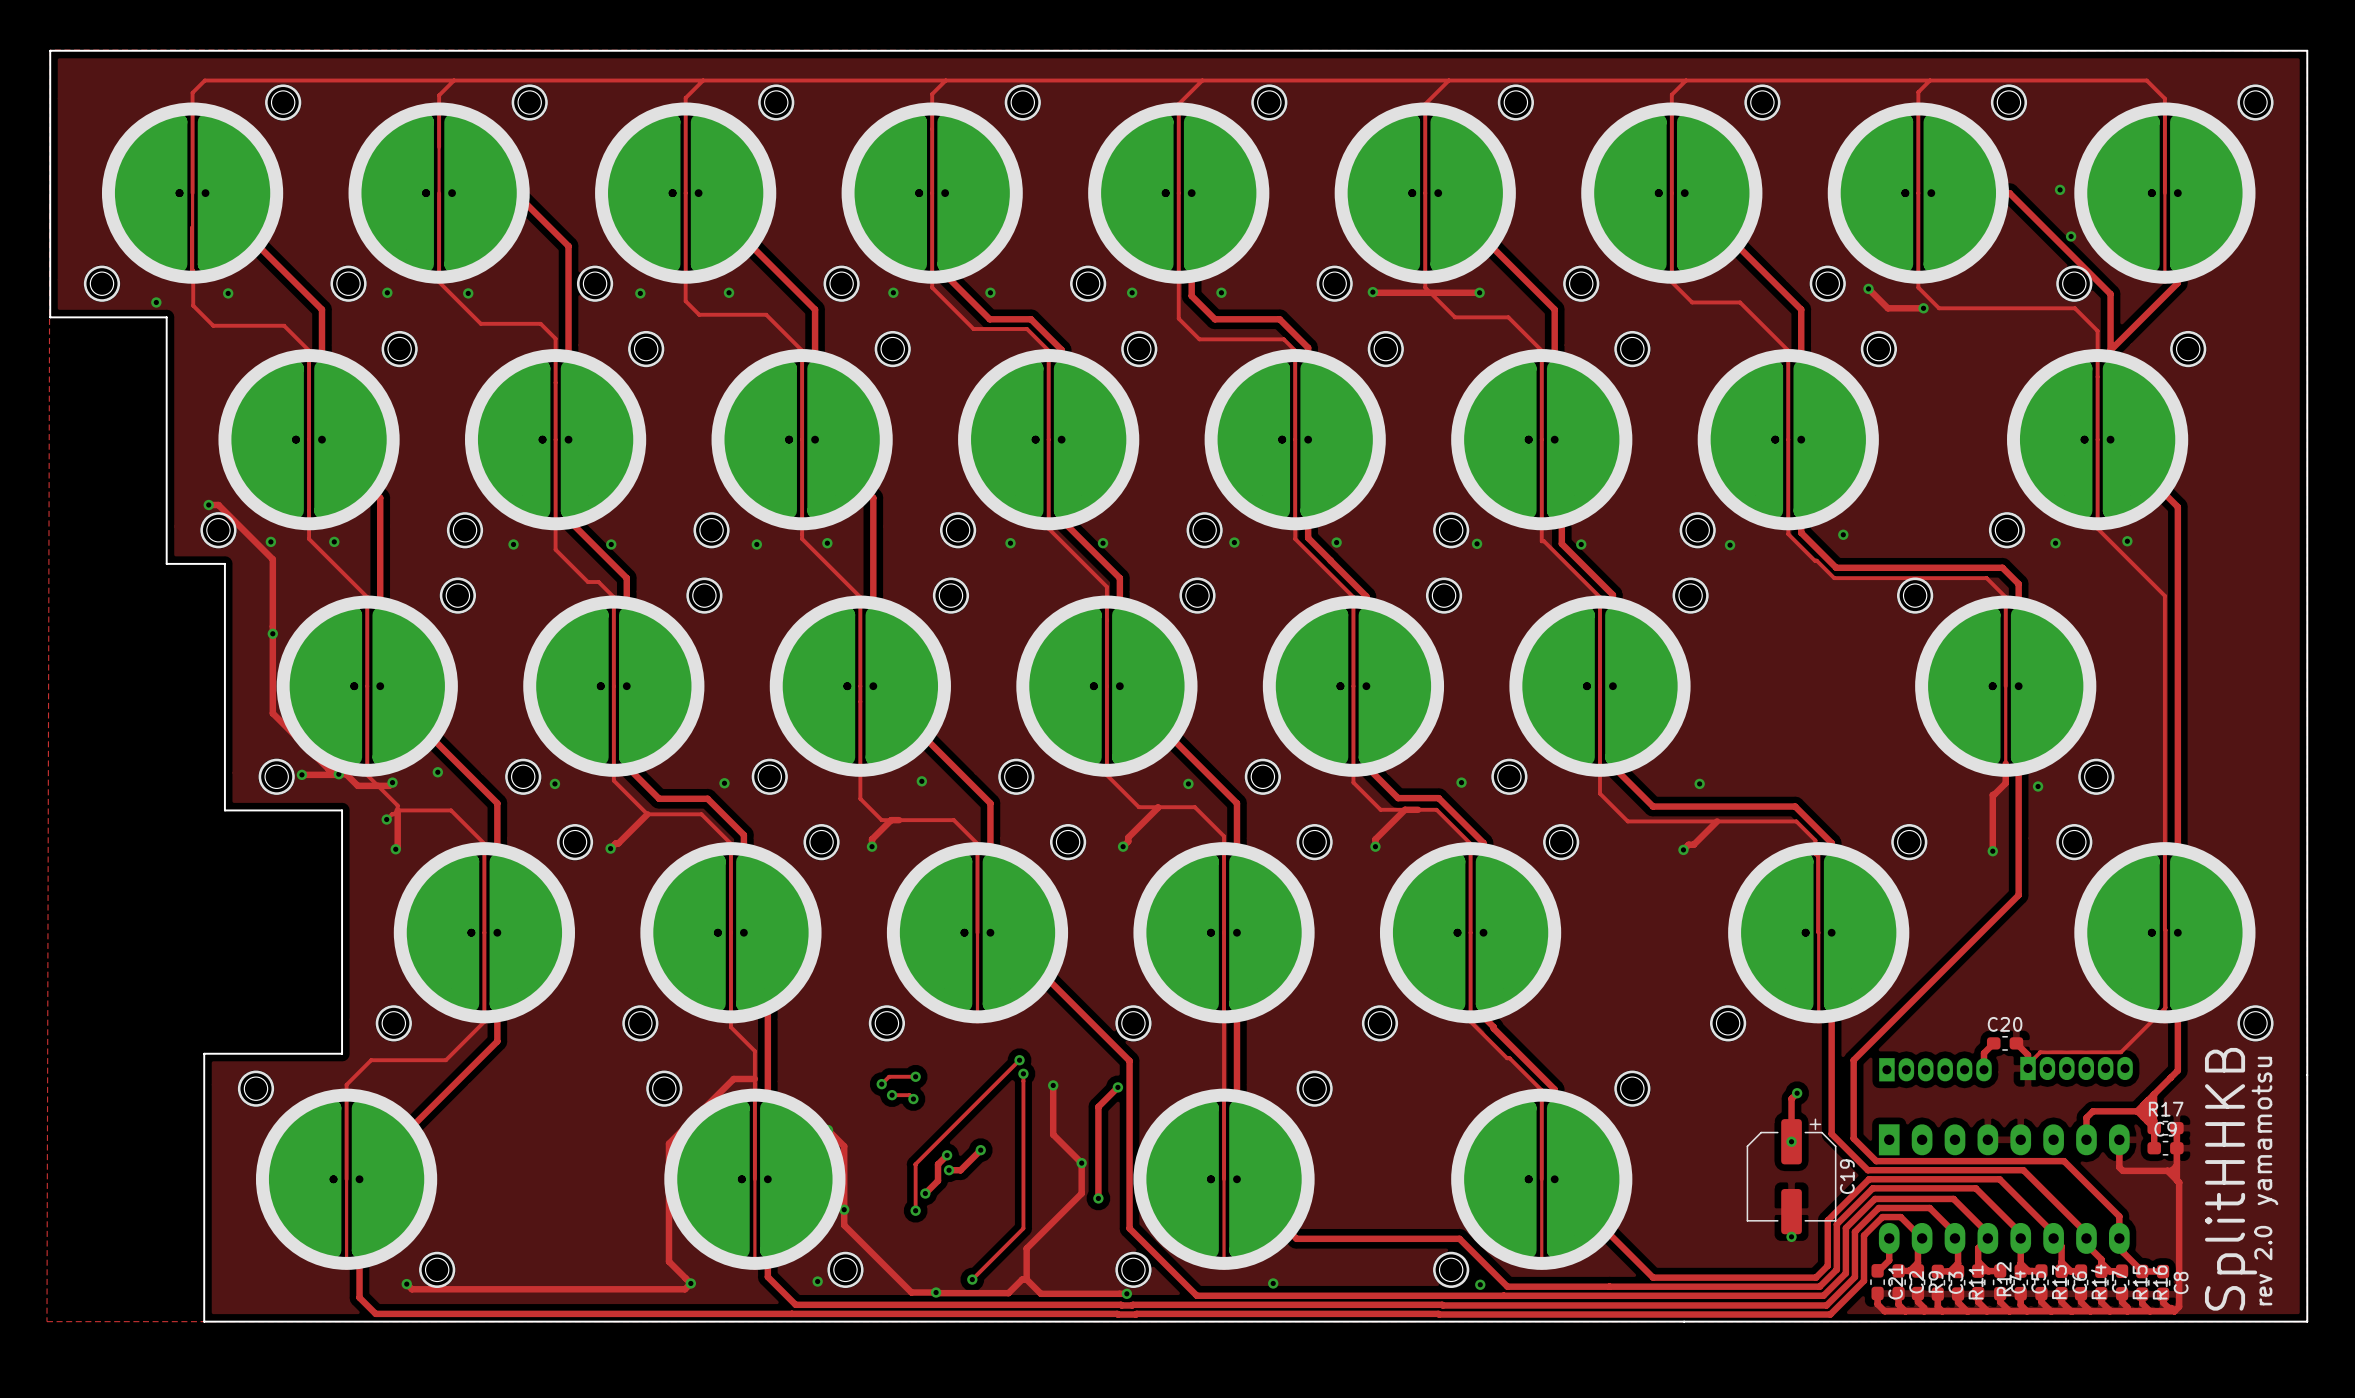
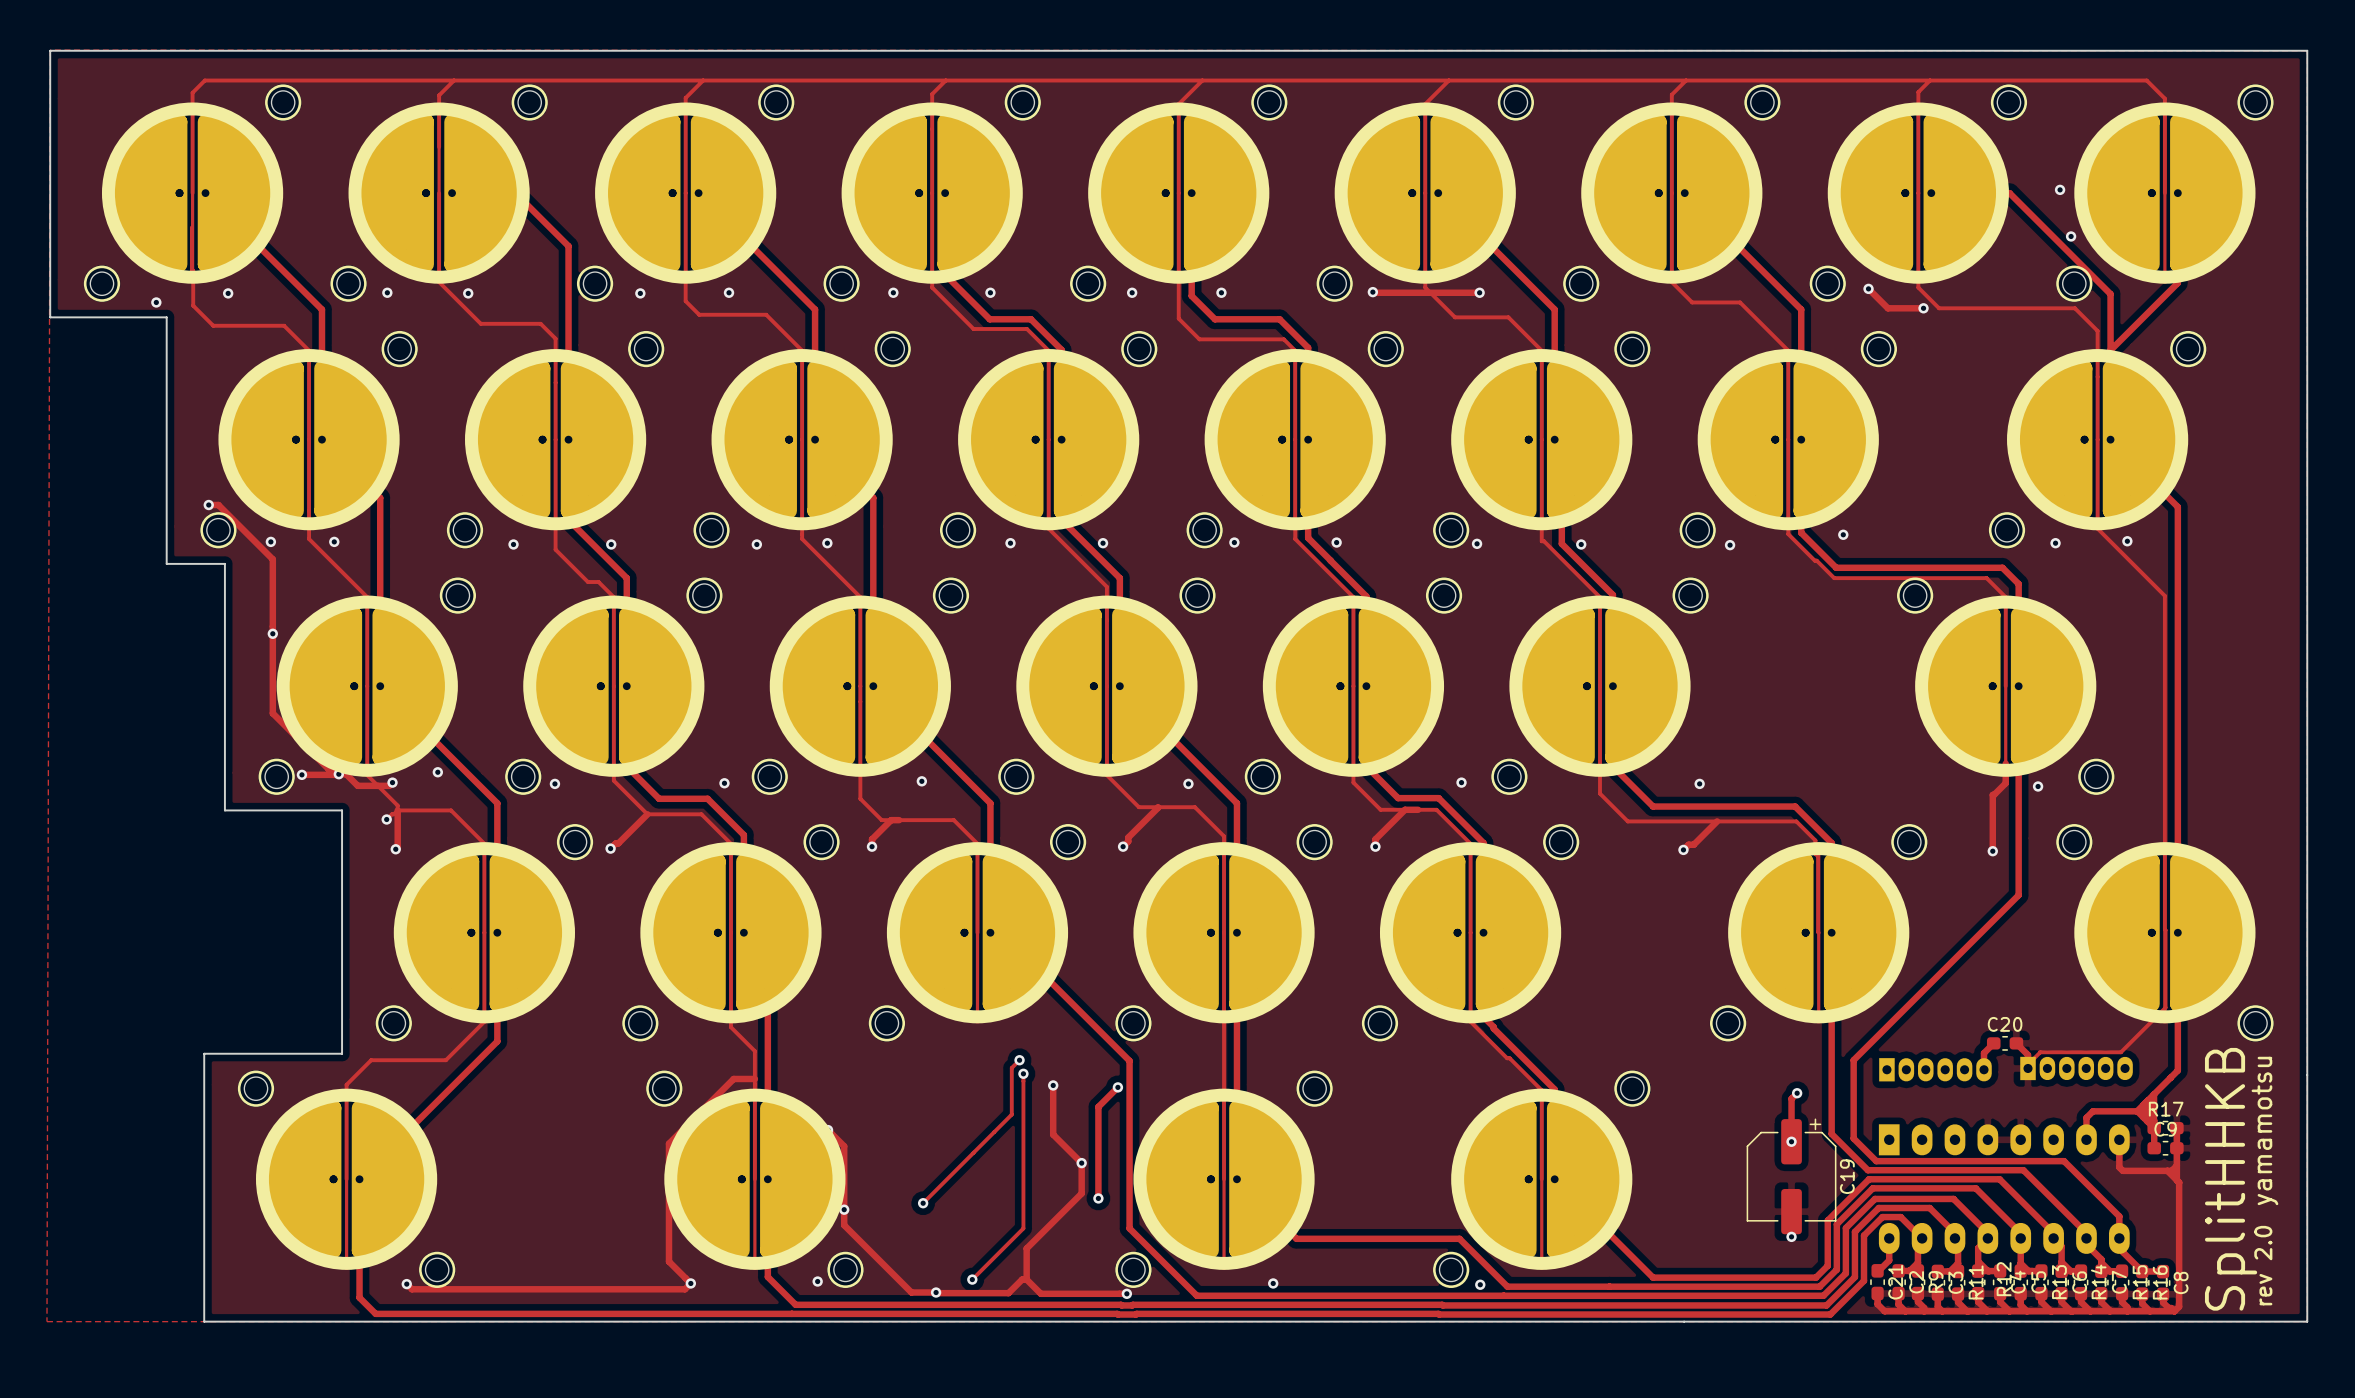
track: (1011, 1067) (915, 1164) (915, 1210) -> (1011, 1067) (1011, 1114) (923, 1203)
track: (915, 1076) (889, 1076) (881, 1084) -> none
via: (915, 1076) -> none
via: (881, 1084) -> none
track: (892, 1095) (909, 1095) (913, 1099) -> none
via: (892, 1095) -> none
via: (913, 1099) -> none
track: (980, 1150) (960, 1170) (949, 1170) -> none
via: (980, 1150) -> none
track: (947, 1155) (938, 1164) (938, 1180) (925, 1193) -> none
via: (947, 1155) -> none
via: (949, 1170) -> none
via: (925, 1193) -> none
via: none -> (923, 1203)
via: (915, 1210) -> none

